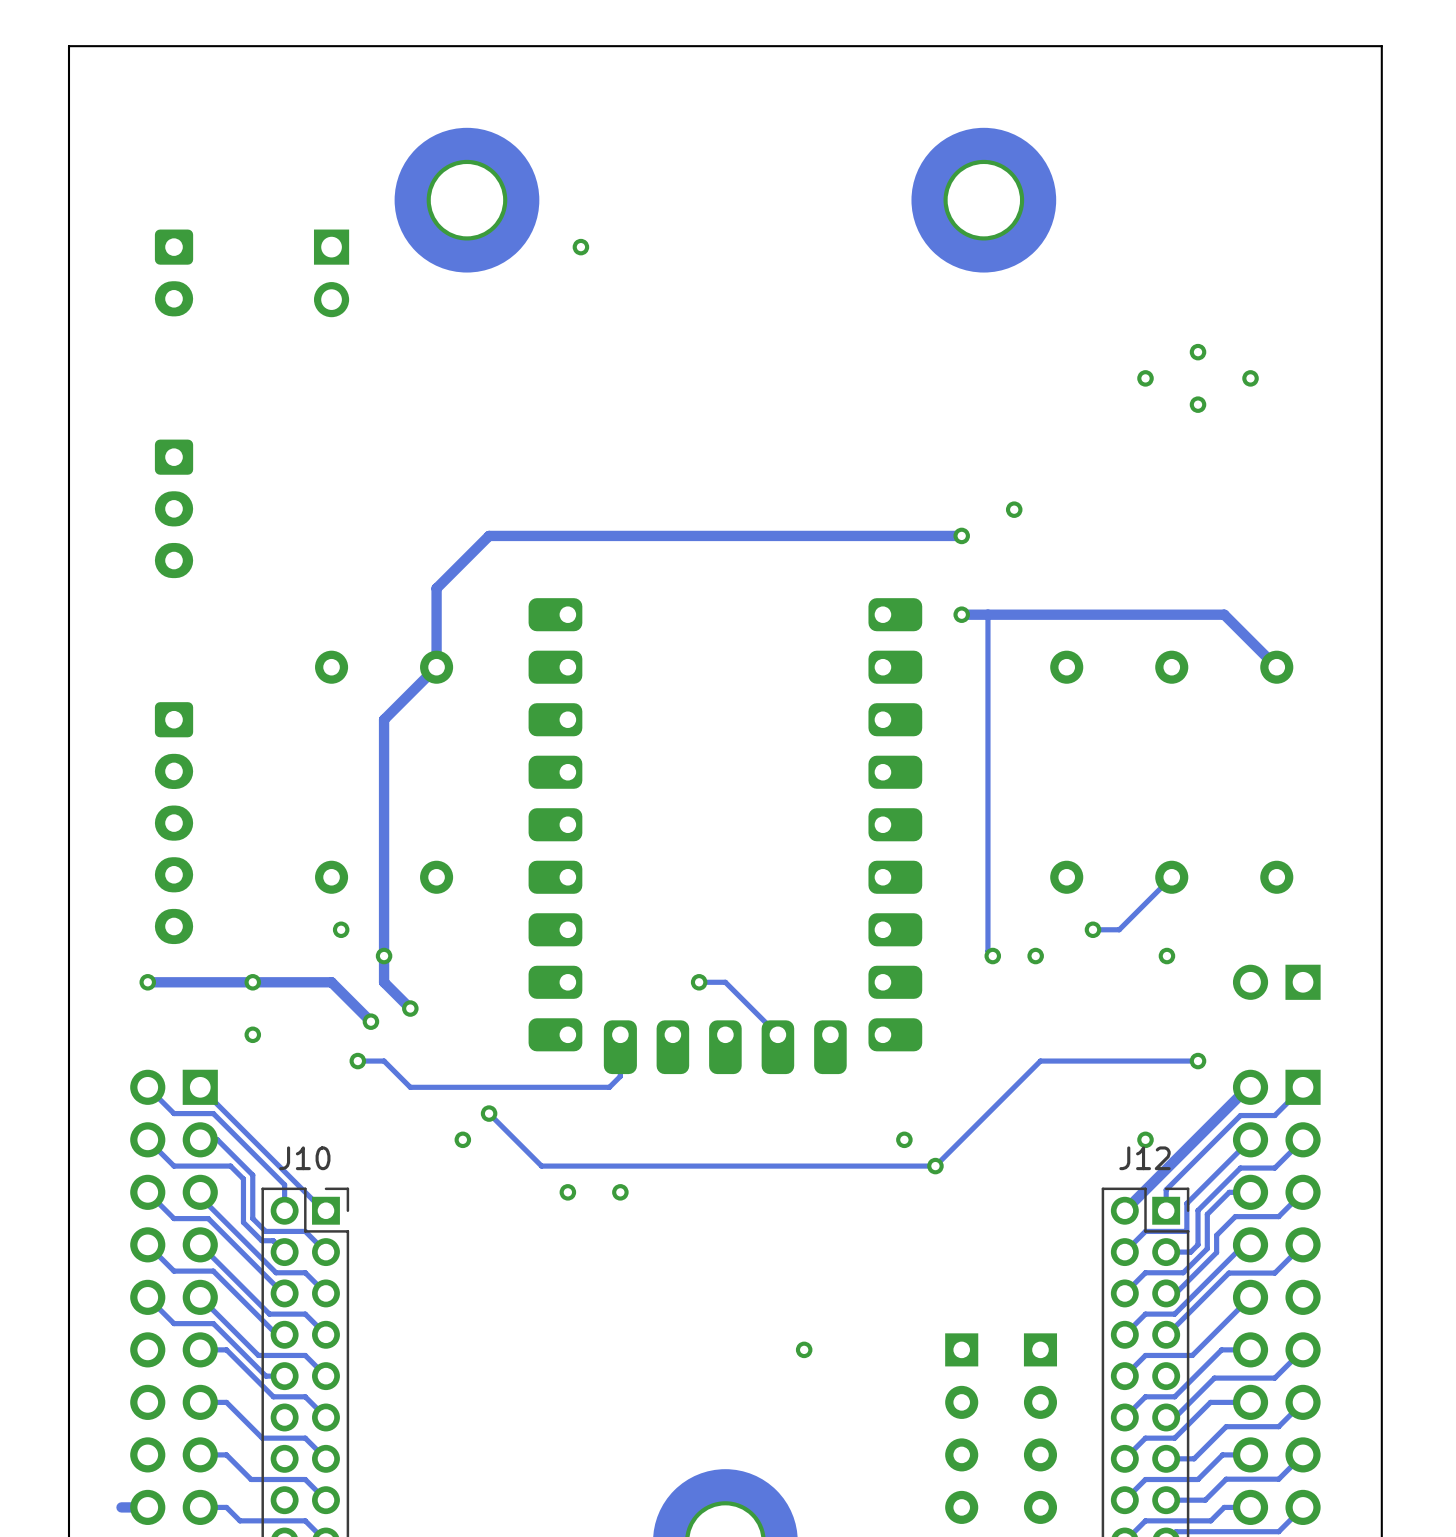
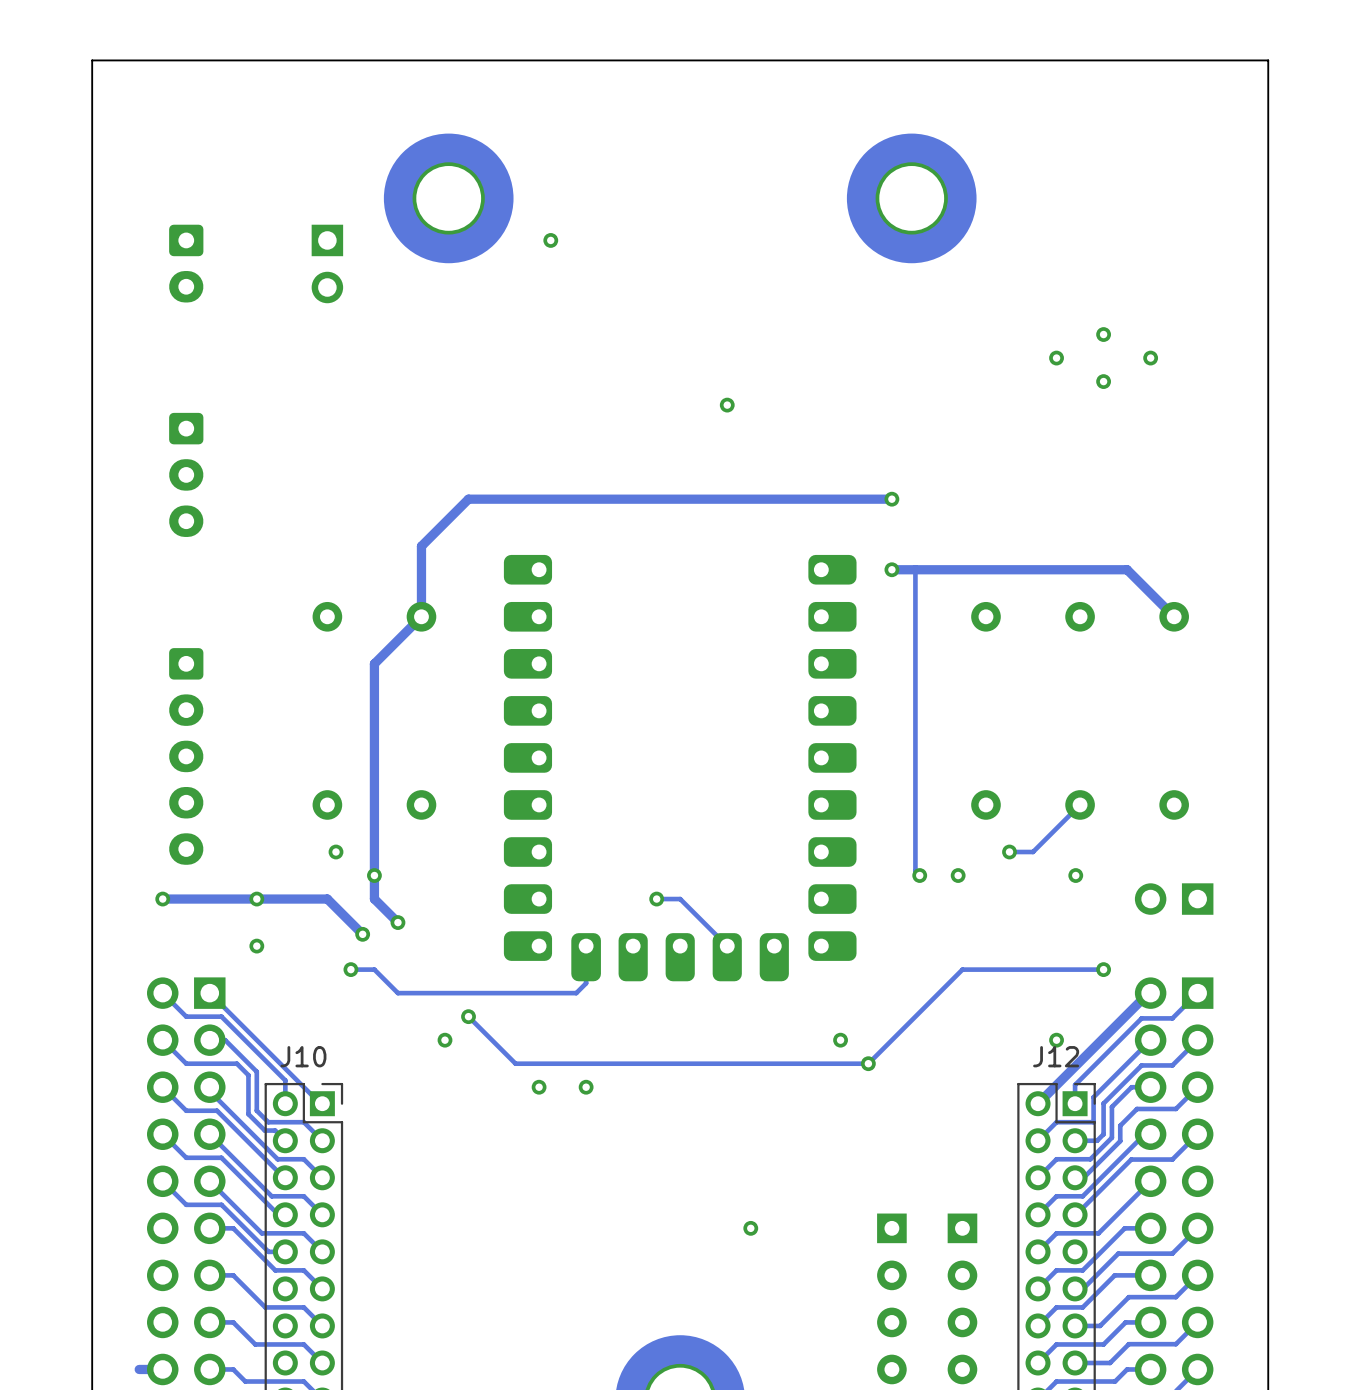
via: none -> (727, 405)
via: (1014, 509) -> none

